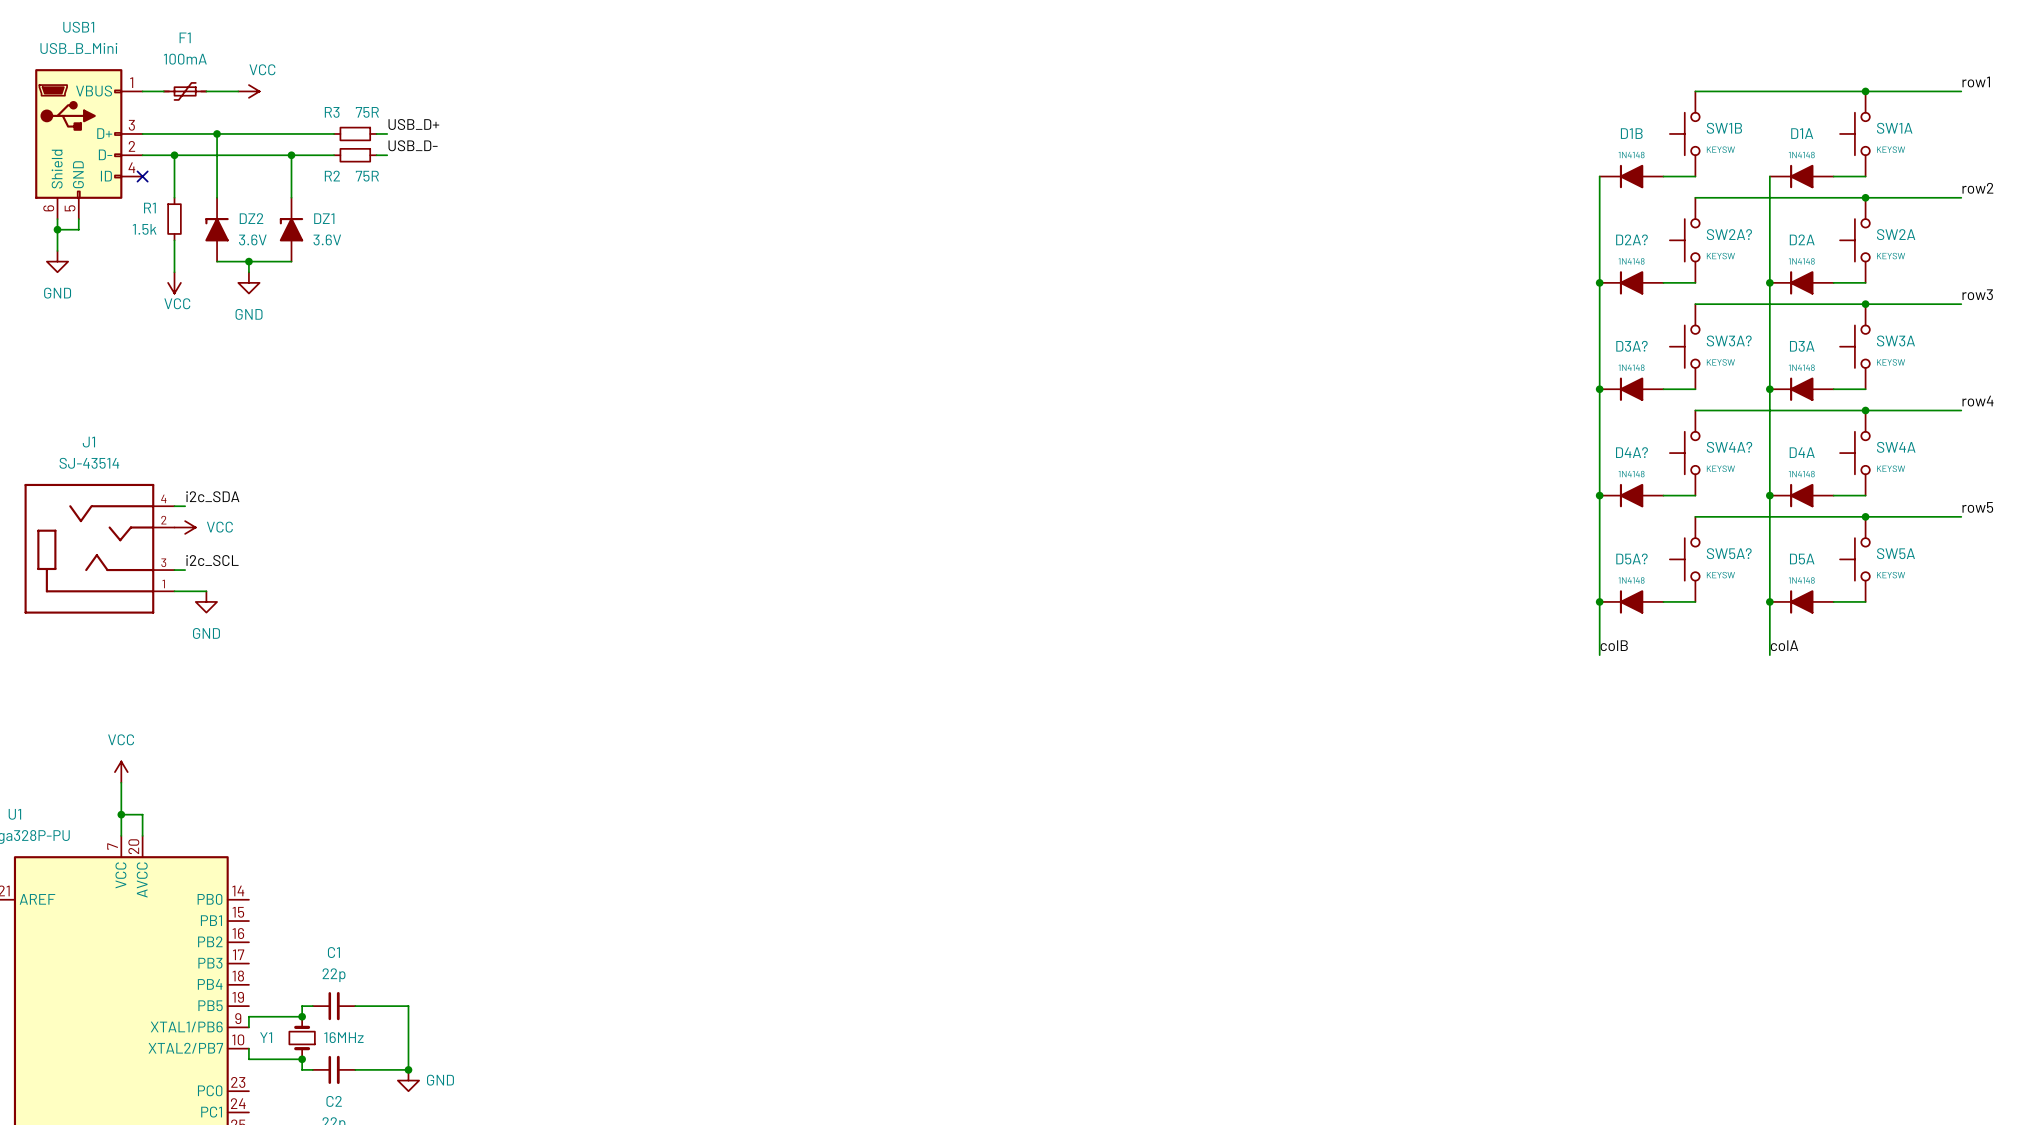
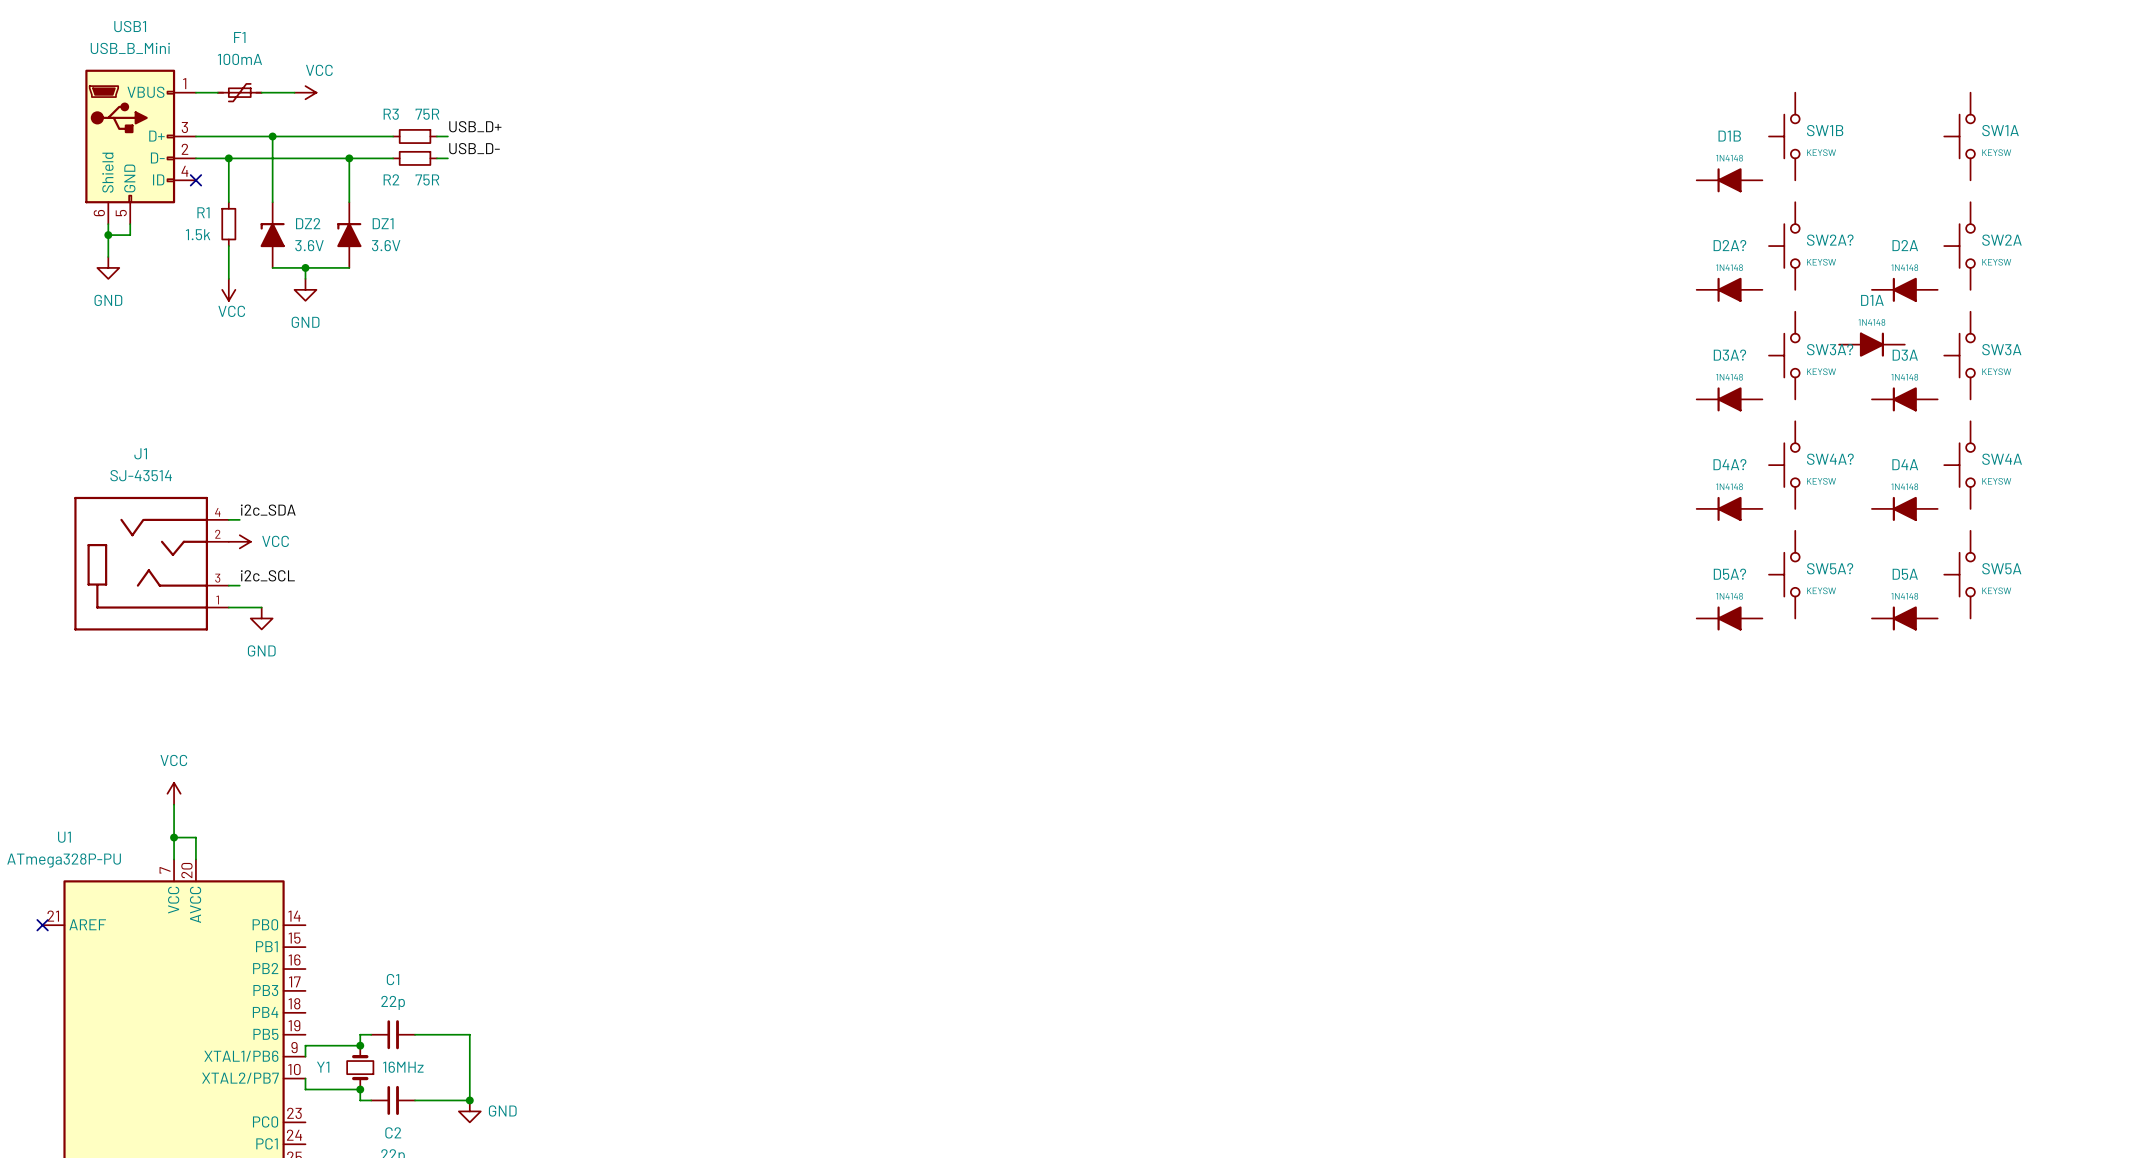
label: row1 (1976, 82) -> none
wire: (1695, 91) (1961, 91) -> none
junction: (1865, 91) -> none
wire: (1599, 176) (1599, 655) -> none
wire: (1663, 176) (1695, 176) -> none
wire: (1769, 176) (1769, 655) -> none
D1A rotation: 0° (1801, 176) -> 180° (1871, 344)
D1A position: (1801, 176) -> (1871, 344)
wire: (1833, 176) (1865, 176) -> none
label: row2 (1977, 188) -> none
wire: (1695, 197) (1961, 197) -> none
junction: (1865, 197) -> none
junction: (1599, 282) -> none
wire: (1663, 282) (1695, 282) -> none
junction: (1769, 282) -> none
wire: (1833, 282) (1865, 282) -> none
label: row3 (1977, 294) -> none
wire: (1695, 304) (1961, 304) -> none
junction: (1865, 304) -> none
junction: (1599, 389) -> none
wire: (1663, 389) (1695, 389) -> none
junction: (1769, 389) -> none
wire: (1833, 389) (1865, 389) -> none
label: row4 (1978, 401) -> none
wire: (1695, 410) (1961, 410) -> none
junction: (1865, 410) -> none
junction: (1599, 495) -> none
wire: (1663, 495) (1695, 495) -> none
junction: (1769, 495) -> none
wire: (1833, 495) (1865, 495) -> none
label: row5 (1977, 507) -> none
wire: (1695, 516) (1961, 516) -> none
junction: (1865, 516) -> none
junction: (1599, 601) -> none
wire: (1663, 601) (1695, 601) -> none
junction: (1769, 601) -> none
wire: (1833, 601) (1865, 601) -> none
label: colB (1614, 645) -> none
label: colA (1784, 645) -> none

